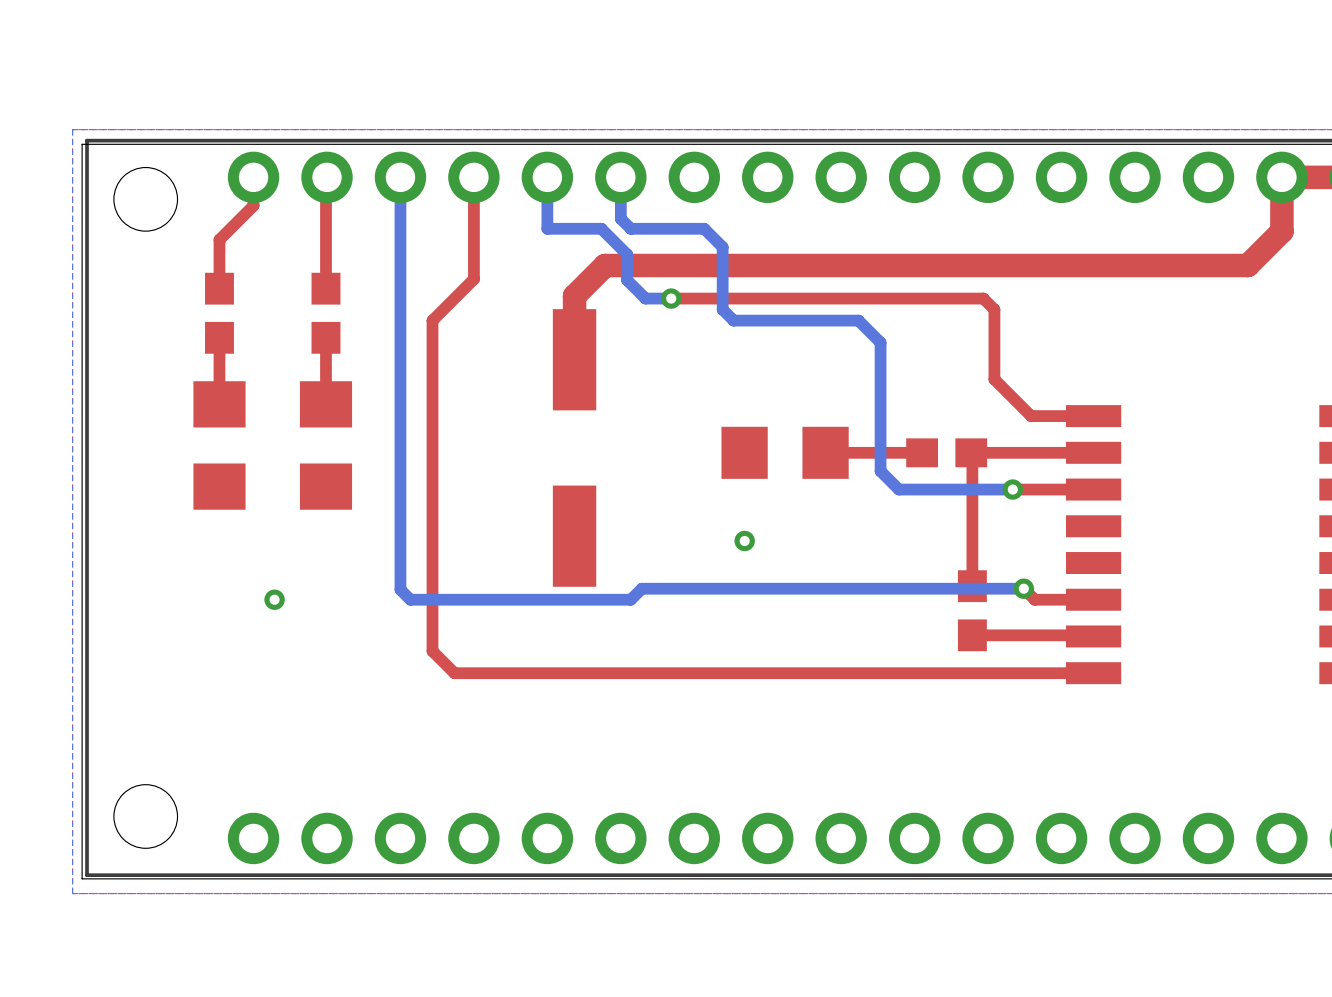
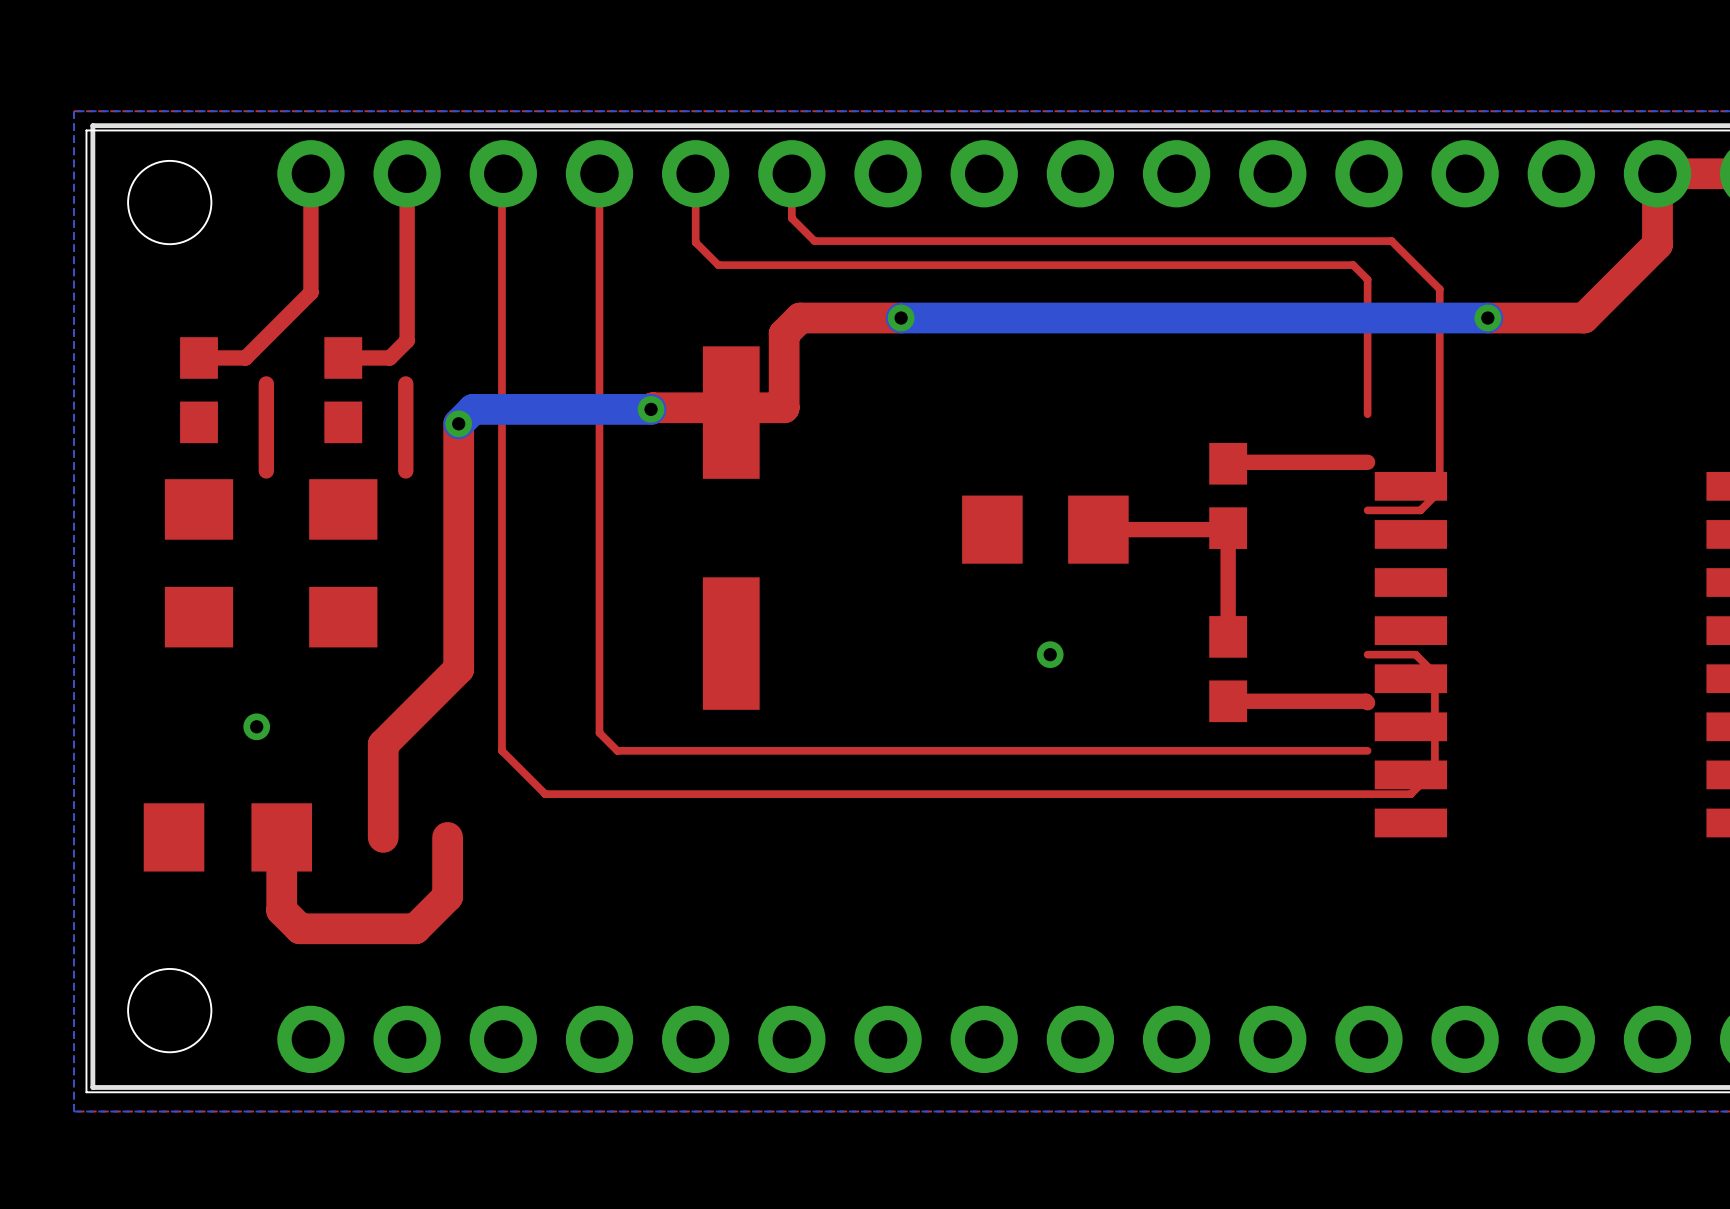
top track: (327, 177) (325, 288) -> (407, 173) (407, 340) (389, 357) (343, 357)
top track: none -> (503, 173) (501, 750) (545, 794) (1410, 794) (1434, 770) (1434, 673) (1415, 654) (1367, 654)
bottom track: (400, 177) (400, 589) (410, 599) (630, 599) (641, 588) (1023, 588) -> none
top track width: thick (473, 177) (473, 279) -> thin (599, 173) (599, 307)
top track: none -> (695, 173) (695, 242) (718, 265) (1353, 265) (1367, 279) (1367, 414)
bottom track: (547, 177) (547, 228) (601, 228) (627, 254) (627, 280) (645, 298) (671, 298) -> none
top track: none -> (791, 173) (791, 218) (814, 241) (1391, 241) (1439, 289) (1439, 491) (1420, 510) (1367, 510)
bottom track: (620, 177) (620, 218) (630, 228) (704, 228) (722, 247) (722, 309) (733, 320) (858, 320) (880, 342) (880, 471) (898, 489) (1012, 489) -> none
top track: (253, 205) (219, 239) (219, 288) -> (310, 210) (310, 292) (245, 357) (199, 357)
top track: (1247, 265) (605, 265) (574, 296) (574, 359) -> (1612, 289) (1584, 318) (1487, 318)
top track: (473, 279) (432, 320) (432, 651) (454, 673) (1093, 673) -> (599, 307) (599, 732) (617, 750) (1367, 750)
top track: none -> (901, 318) (800, 318) (784, 334) (784, 407) (652, 407) (651, 409)
bottom track: none -> (1487, 318) (901, 318)
via: none -> (1487, 318)
top track: (671, 298) (983, 298) (994, 309) (994, 379) (1031, 416) (1093, 416) -> none
via position: (671, 298) -> (901, 318)
part: (219, 313) -> none
part: (325, 313) -> none
part: none -> (199, 390)
part: none -> (343, 390)
bottom track: none -> (651, 409) (473, 409) (458, 423)
via: none -> (651, 409)
top track: none -> (458, 423) (458, 669) (383, 744) (383, 837)
via: none -> (458, 423)
top track: none -> (1367, 462) (1228, 463)
part: (219, 445) -> none
part: (325, 445) -> none
top track: none -> (1098, 529) (1228, 528) (1228, 636)
part position: (785, 452) -> (1045, 529)
top track: (922, 452) (825, 452) -> none
part rotation: 0° (946, 452) -> 90° clockwise (1228, 495)
top track: (1093, 452) (971, 452) (972, 586) -> none
part: none -> (199, 563)
part: none -> (343, 563)
via: (1012, 489) -> none
top track: (1093, 489) (1012, 489) -> none
via position: (744, 540) -> (1050, 654)
part: none -> (1228, 669)
top track: none -> (1228, 701) (1367, 702)
top track: (1023, 588) (1034, 599) (1093, 599) -> none
via: (1023, 588) -> none
via position: (274, 599) -> (256, 726)
part: (972, 610) -> none
top track: (972, 635) (1093, 636) -> none
part: none -> (227, 837)
top track: none -> (447, 837) (447, 896) (415, 928) (300, 928) (281, 910) (281, 837)

